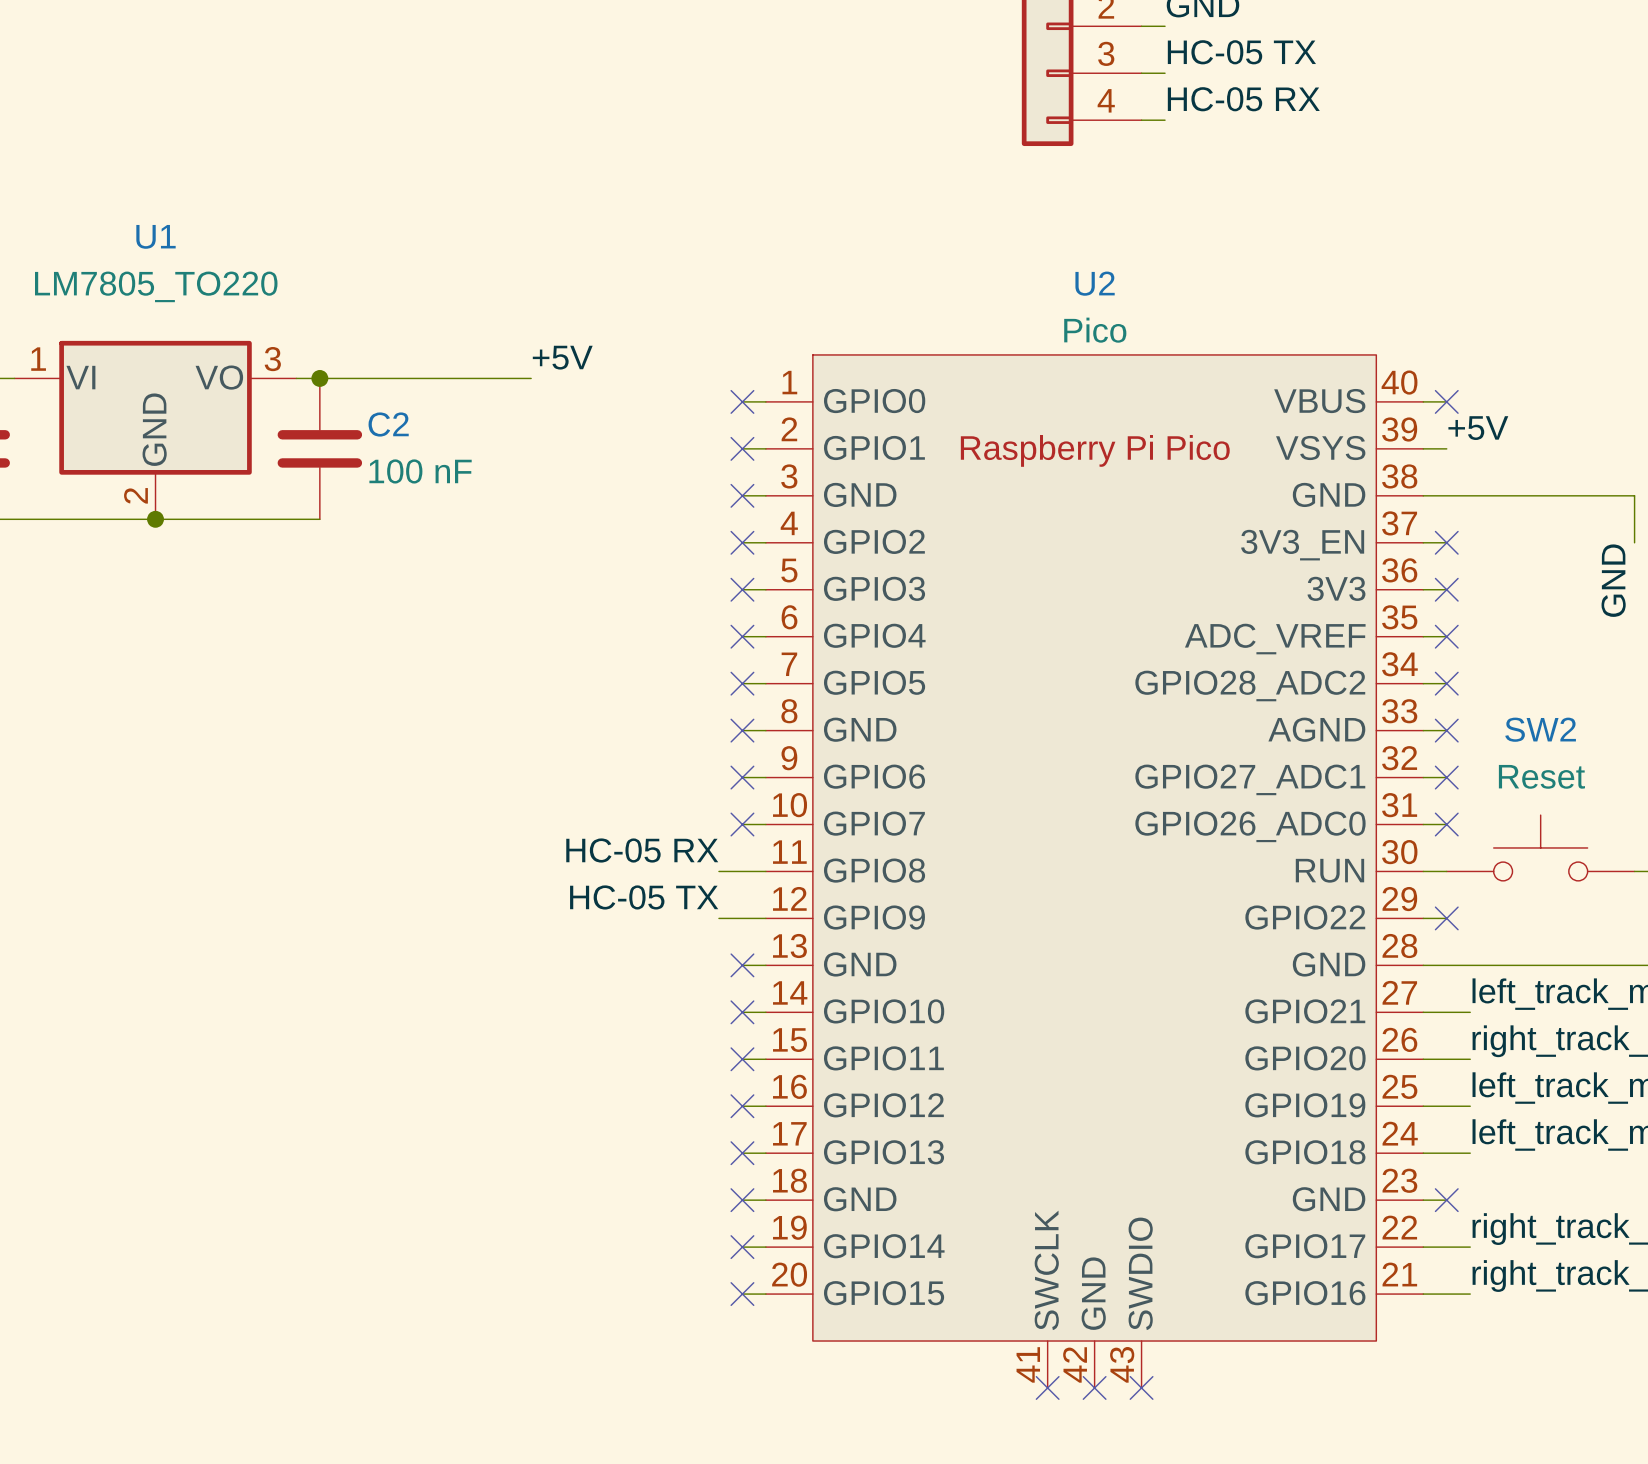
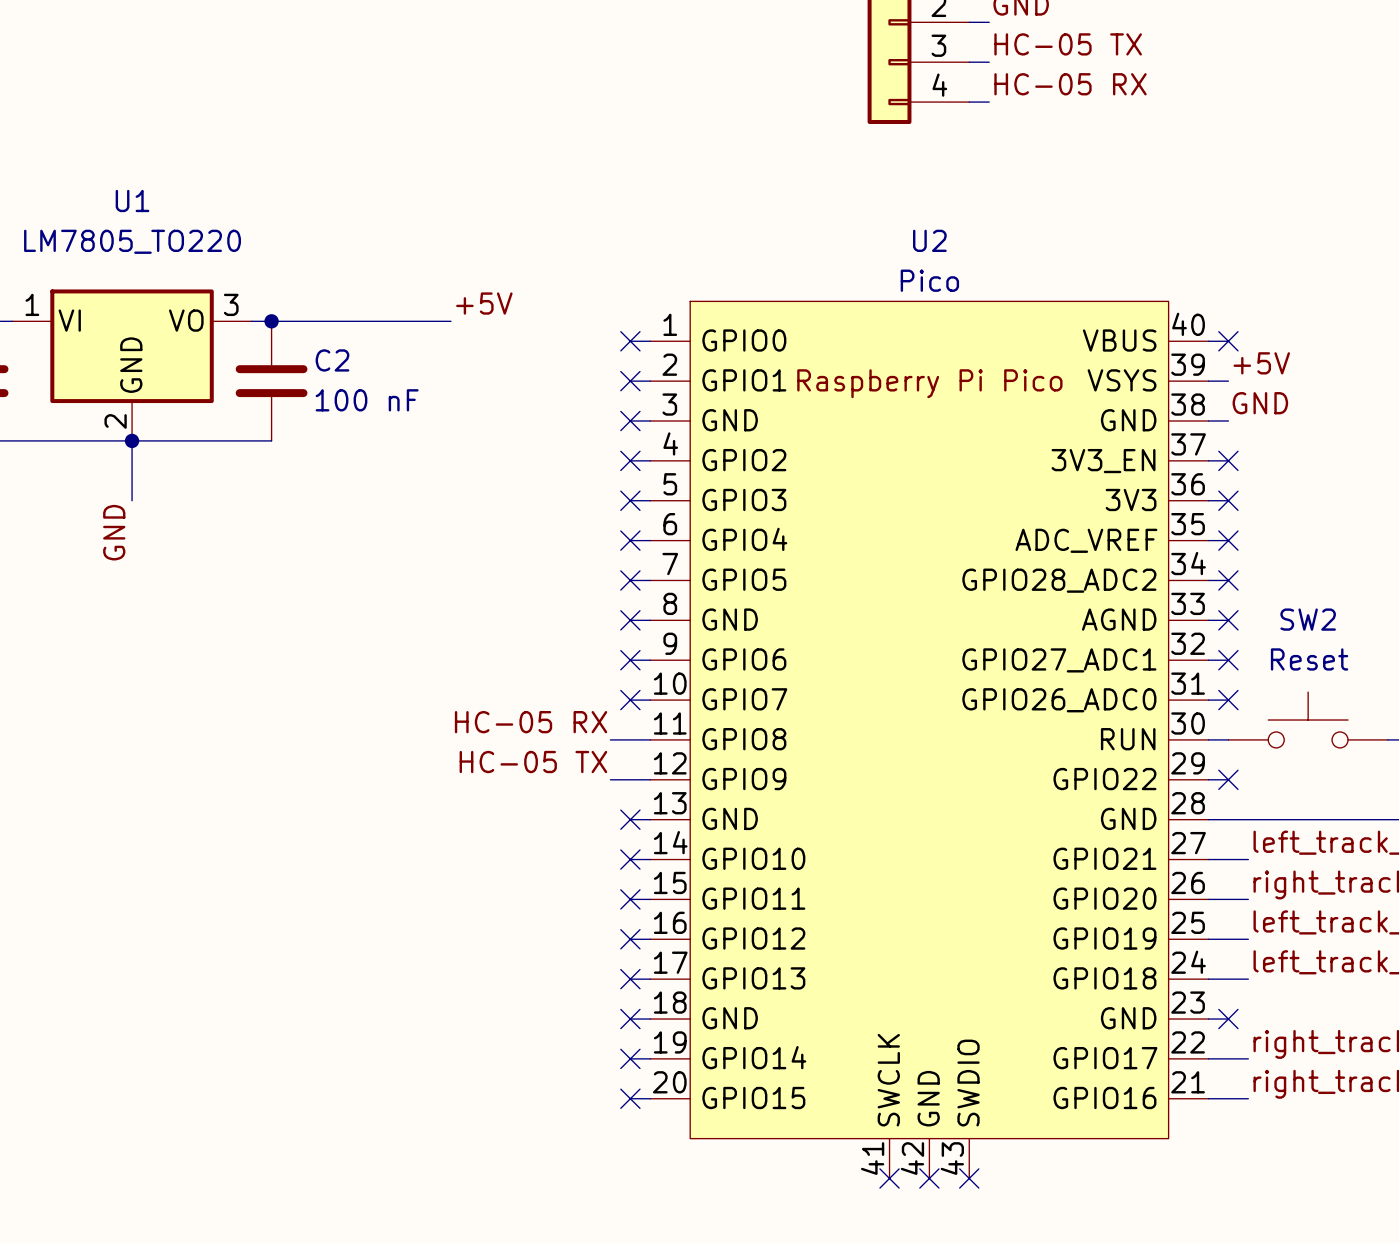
wire: (1446, 495) (1634, 495) (1634, 542) -> none
wire: none -> (132, 440) (132, 500)
label rotation: 0° (1613, 580) -> 90° clockwise (1260, 403)
label position: GND (1613, 580) -> GND (1260, 403)
label: none -> GND (114, 532)

